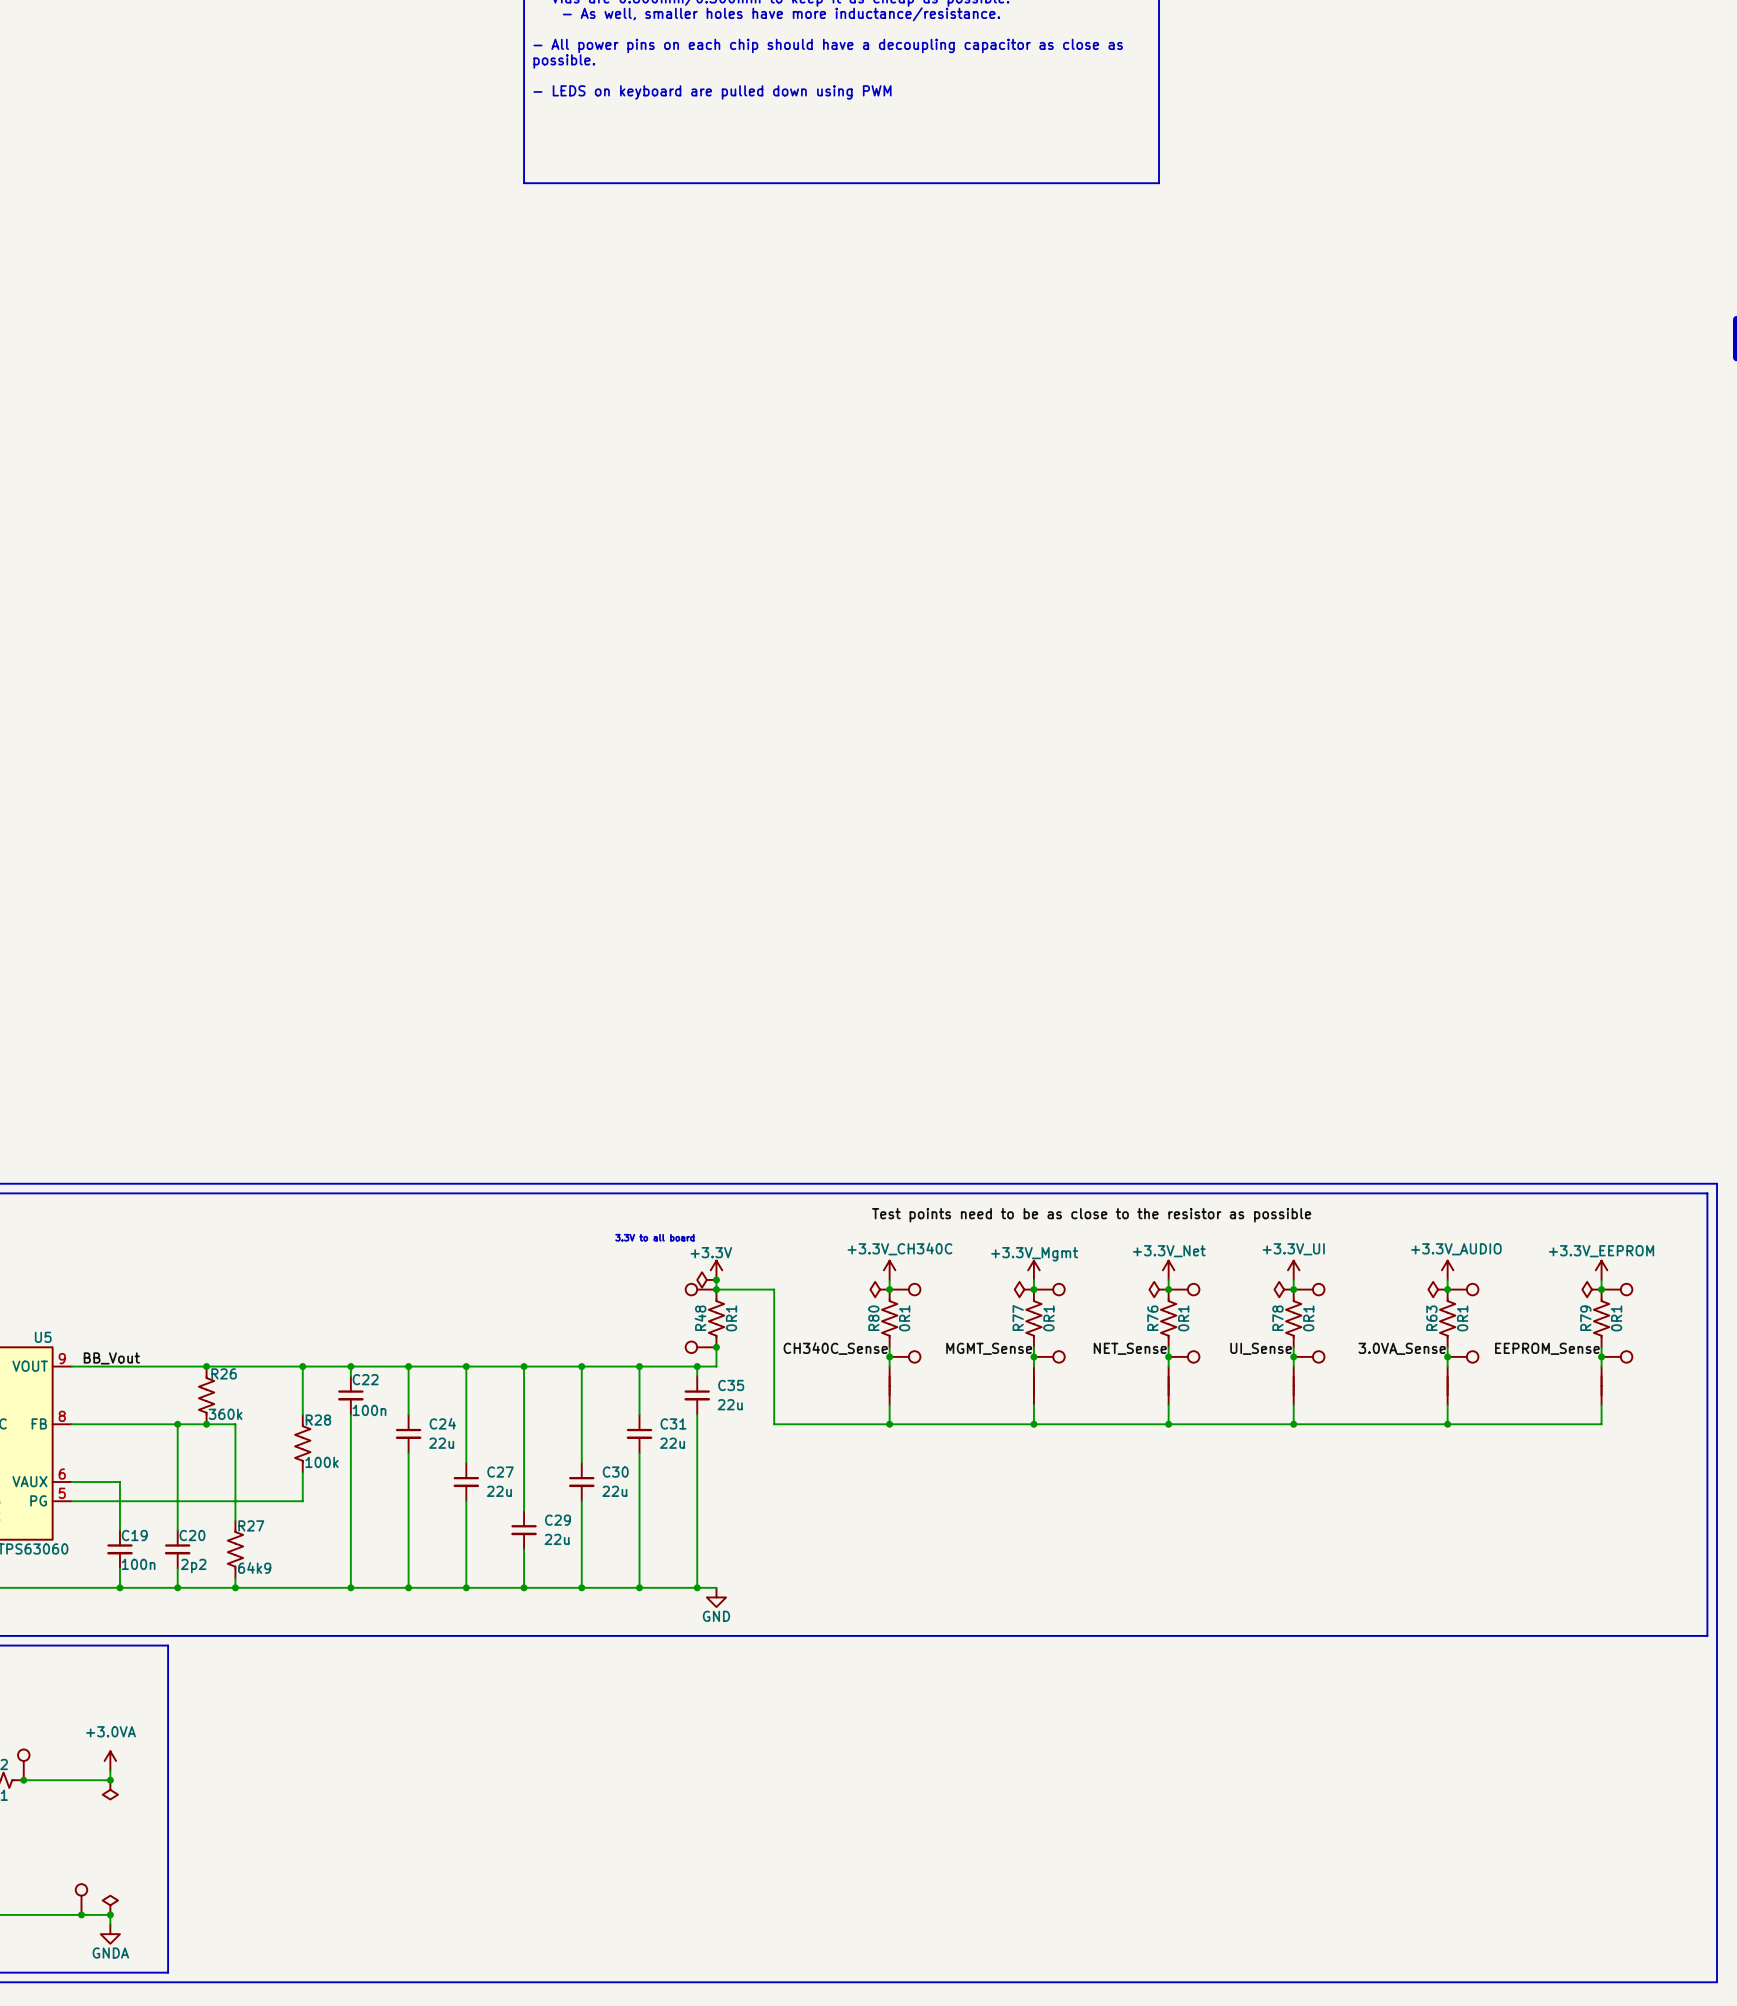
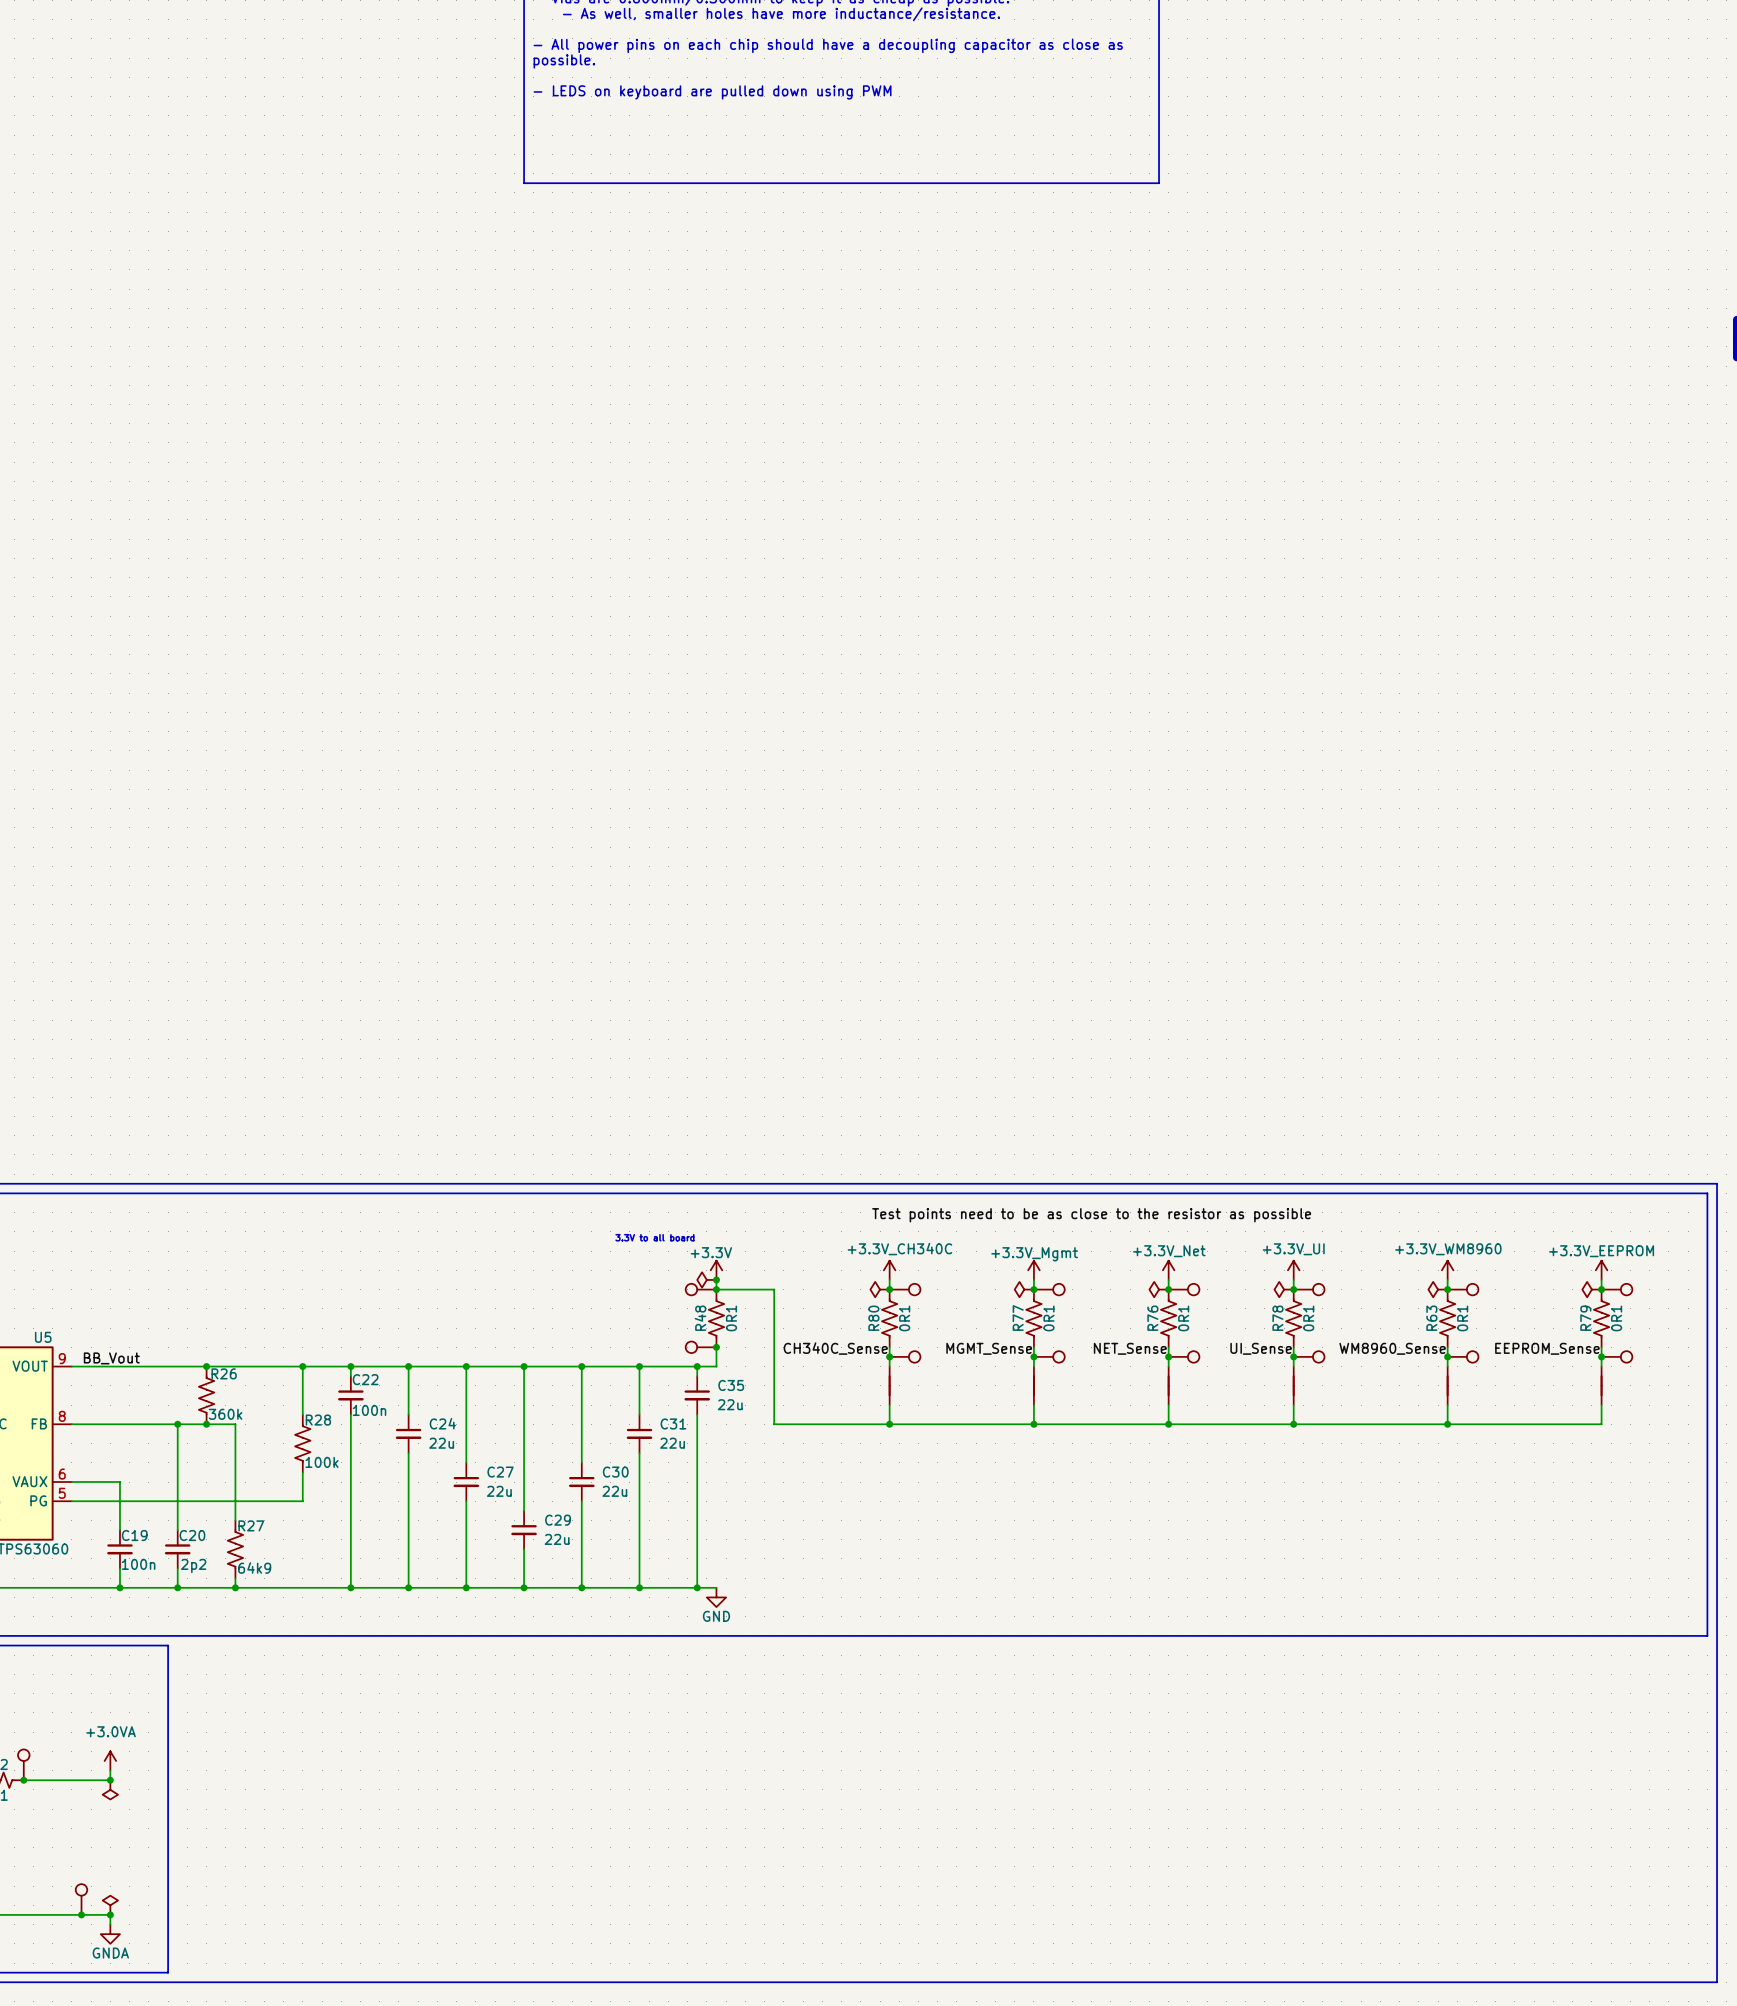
power symbol: +3.3V_AUDIO (1447, 1270) -> +3.3V_WM8960 (1447, 1270)
label: 3.0VA_Sense (1402, 1348) -> WM8960_Sense (1392, 1348)

